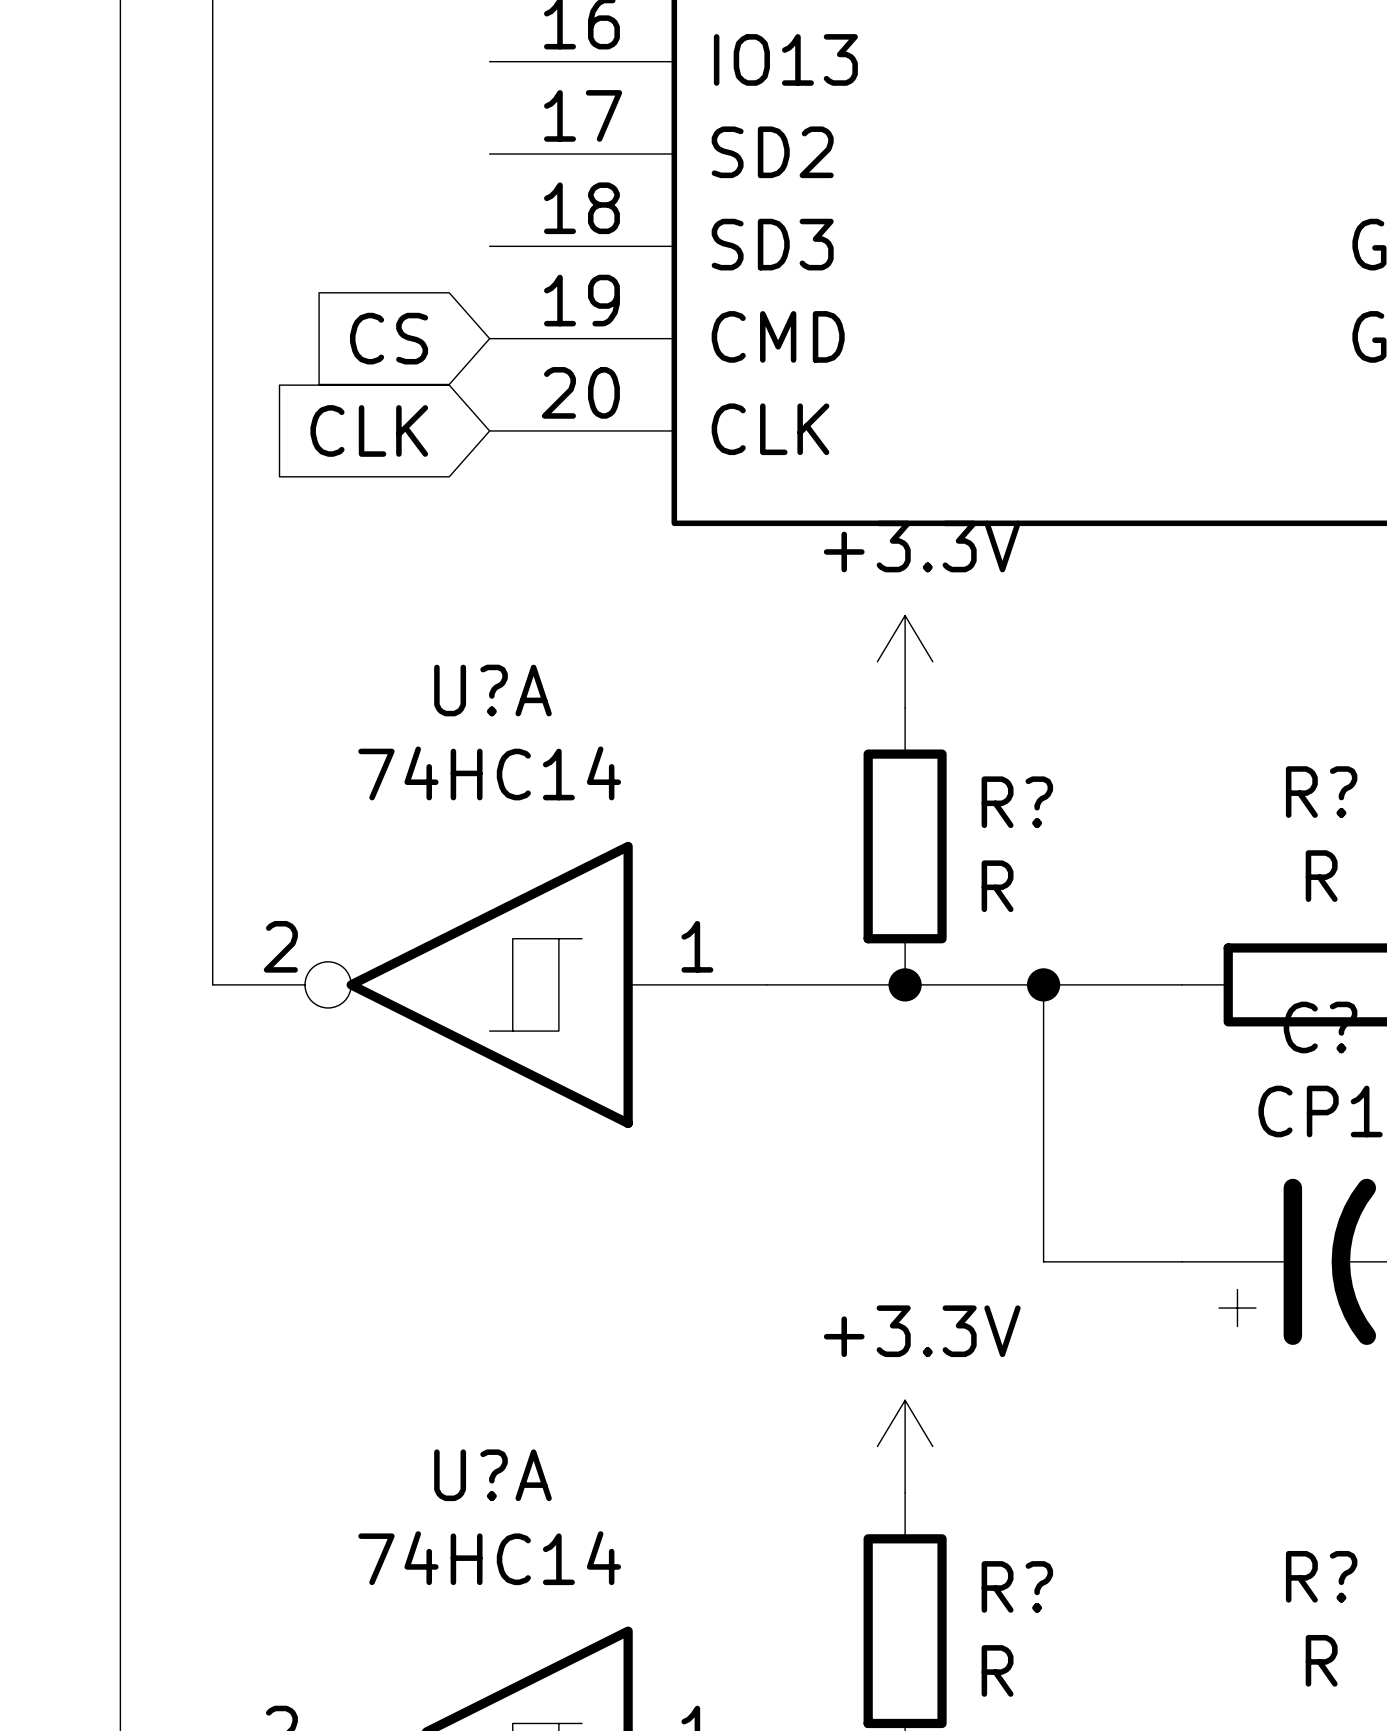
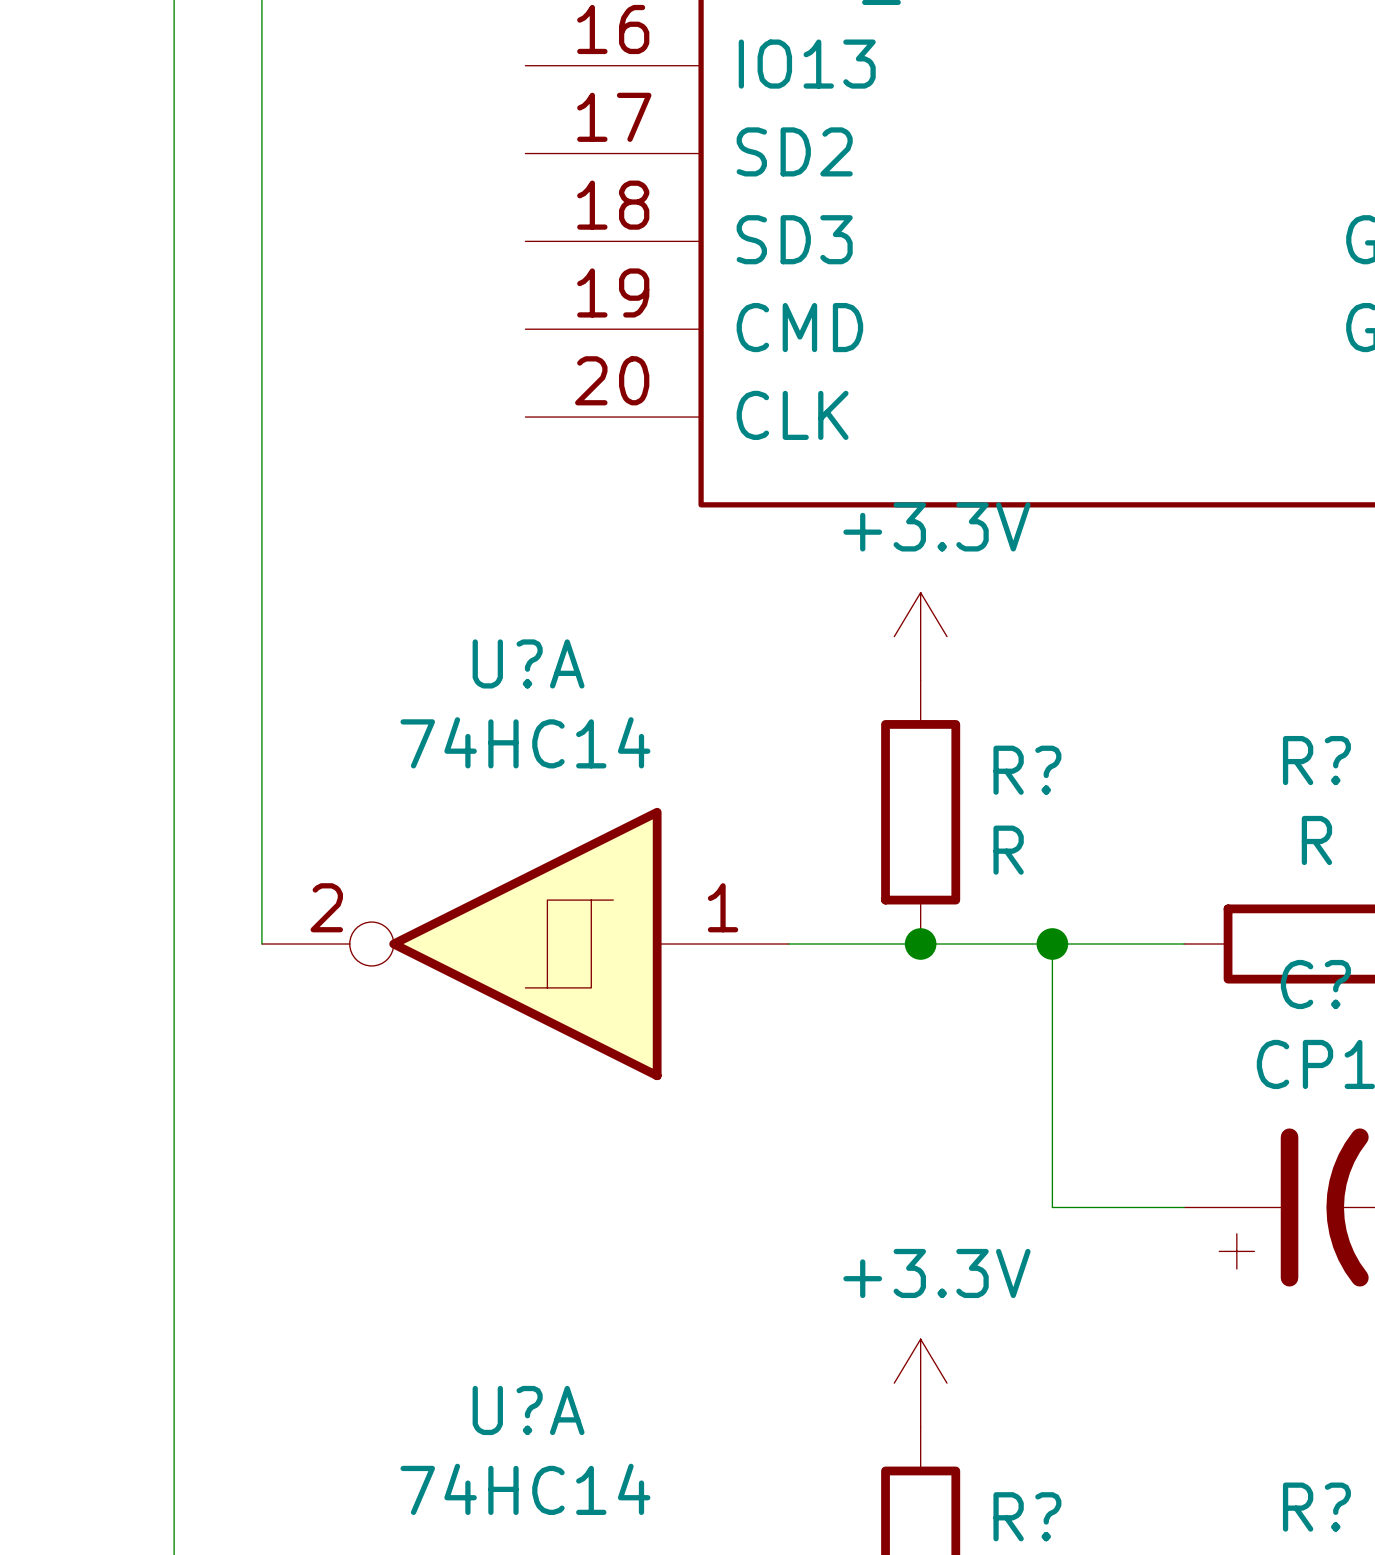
global label: CS (389, 338) -> none
global label: CLK (369, 430) -> none

